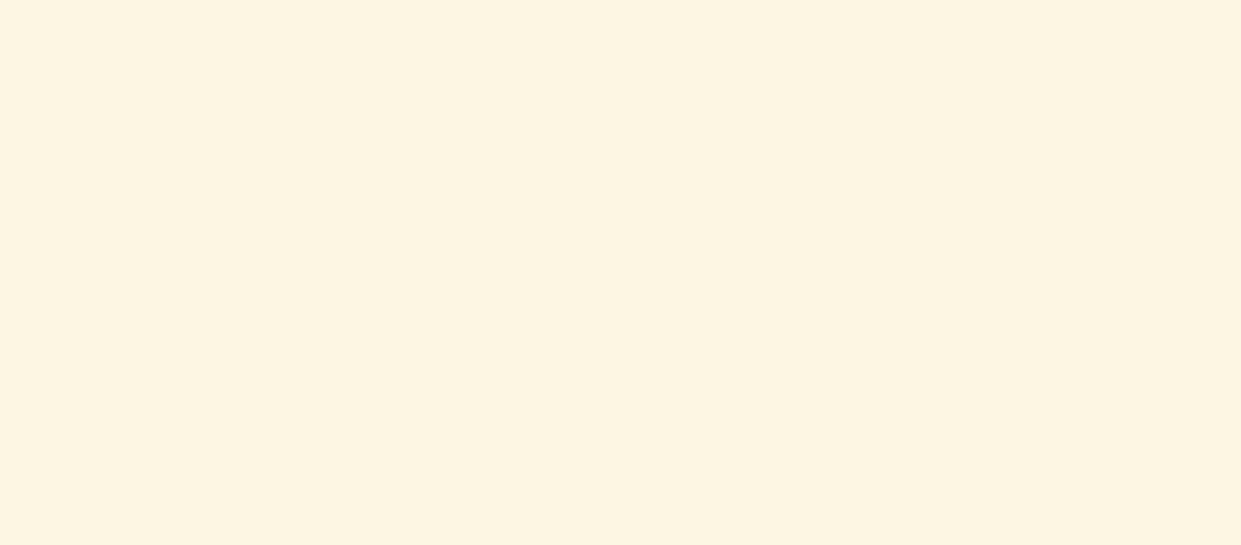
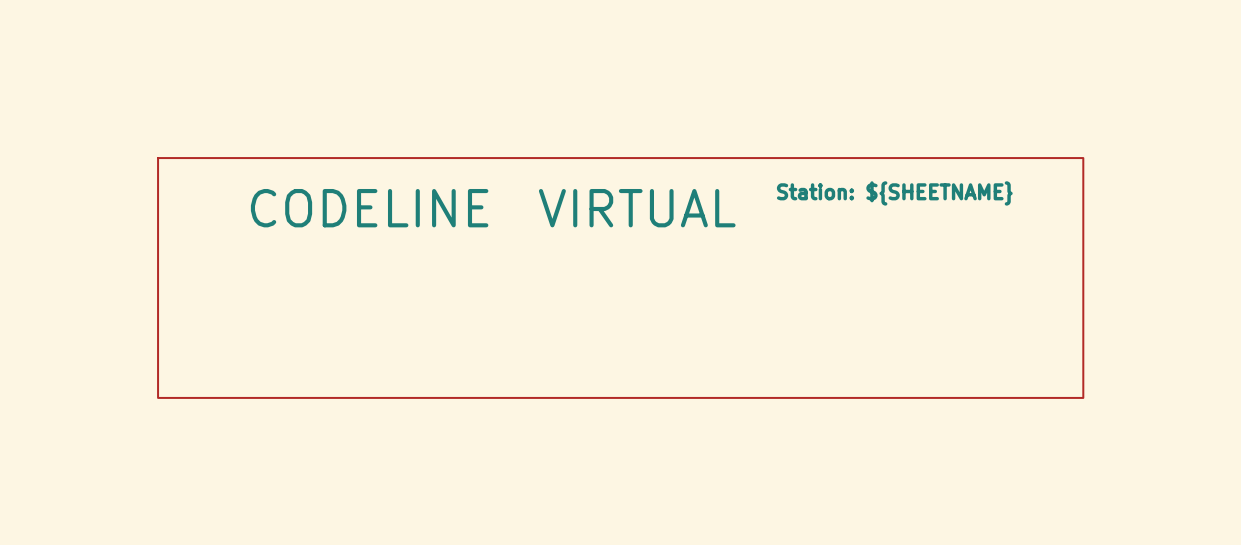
part: none -> VIRTUAL (620, 277)

